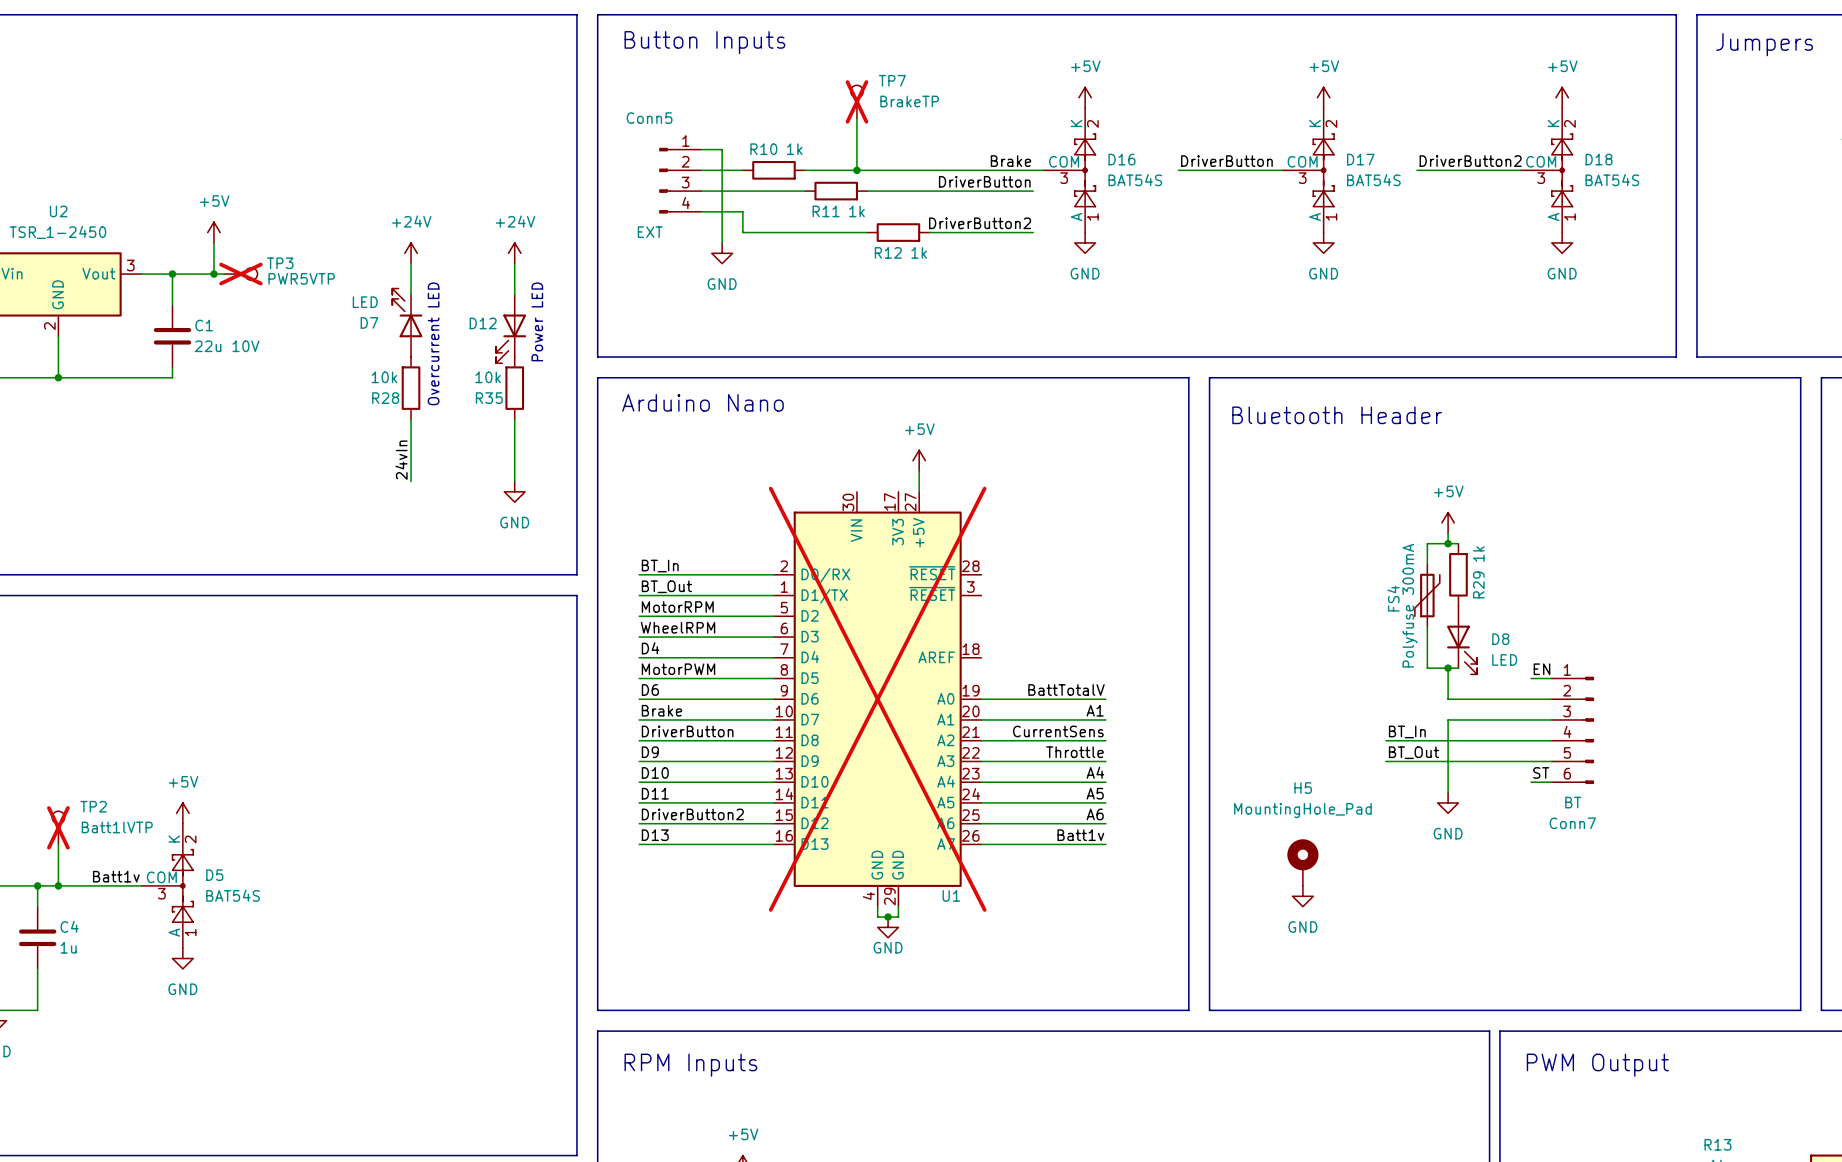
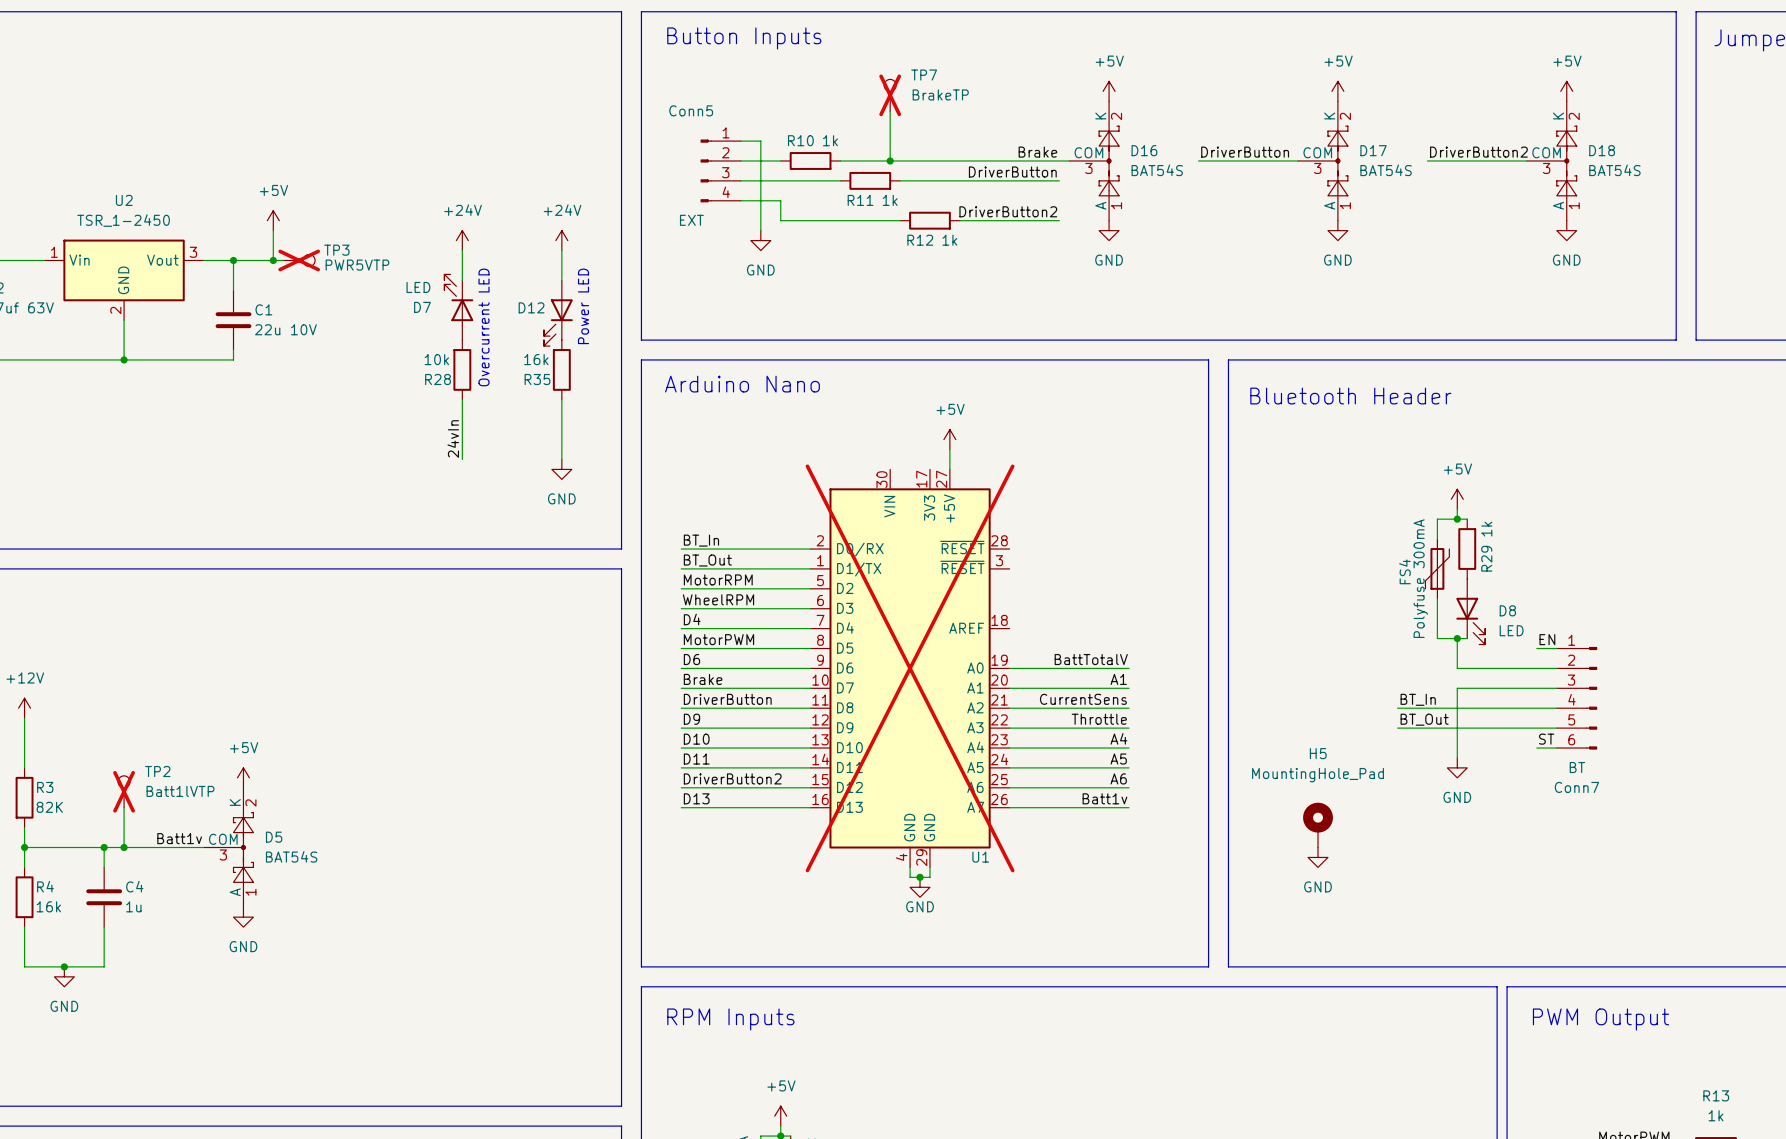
R35 value: 10k (488, 377) -> 16k (536, 359)

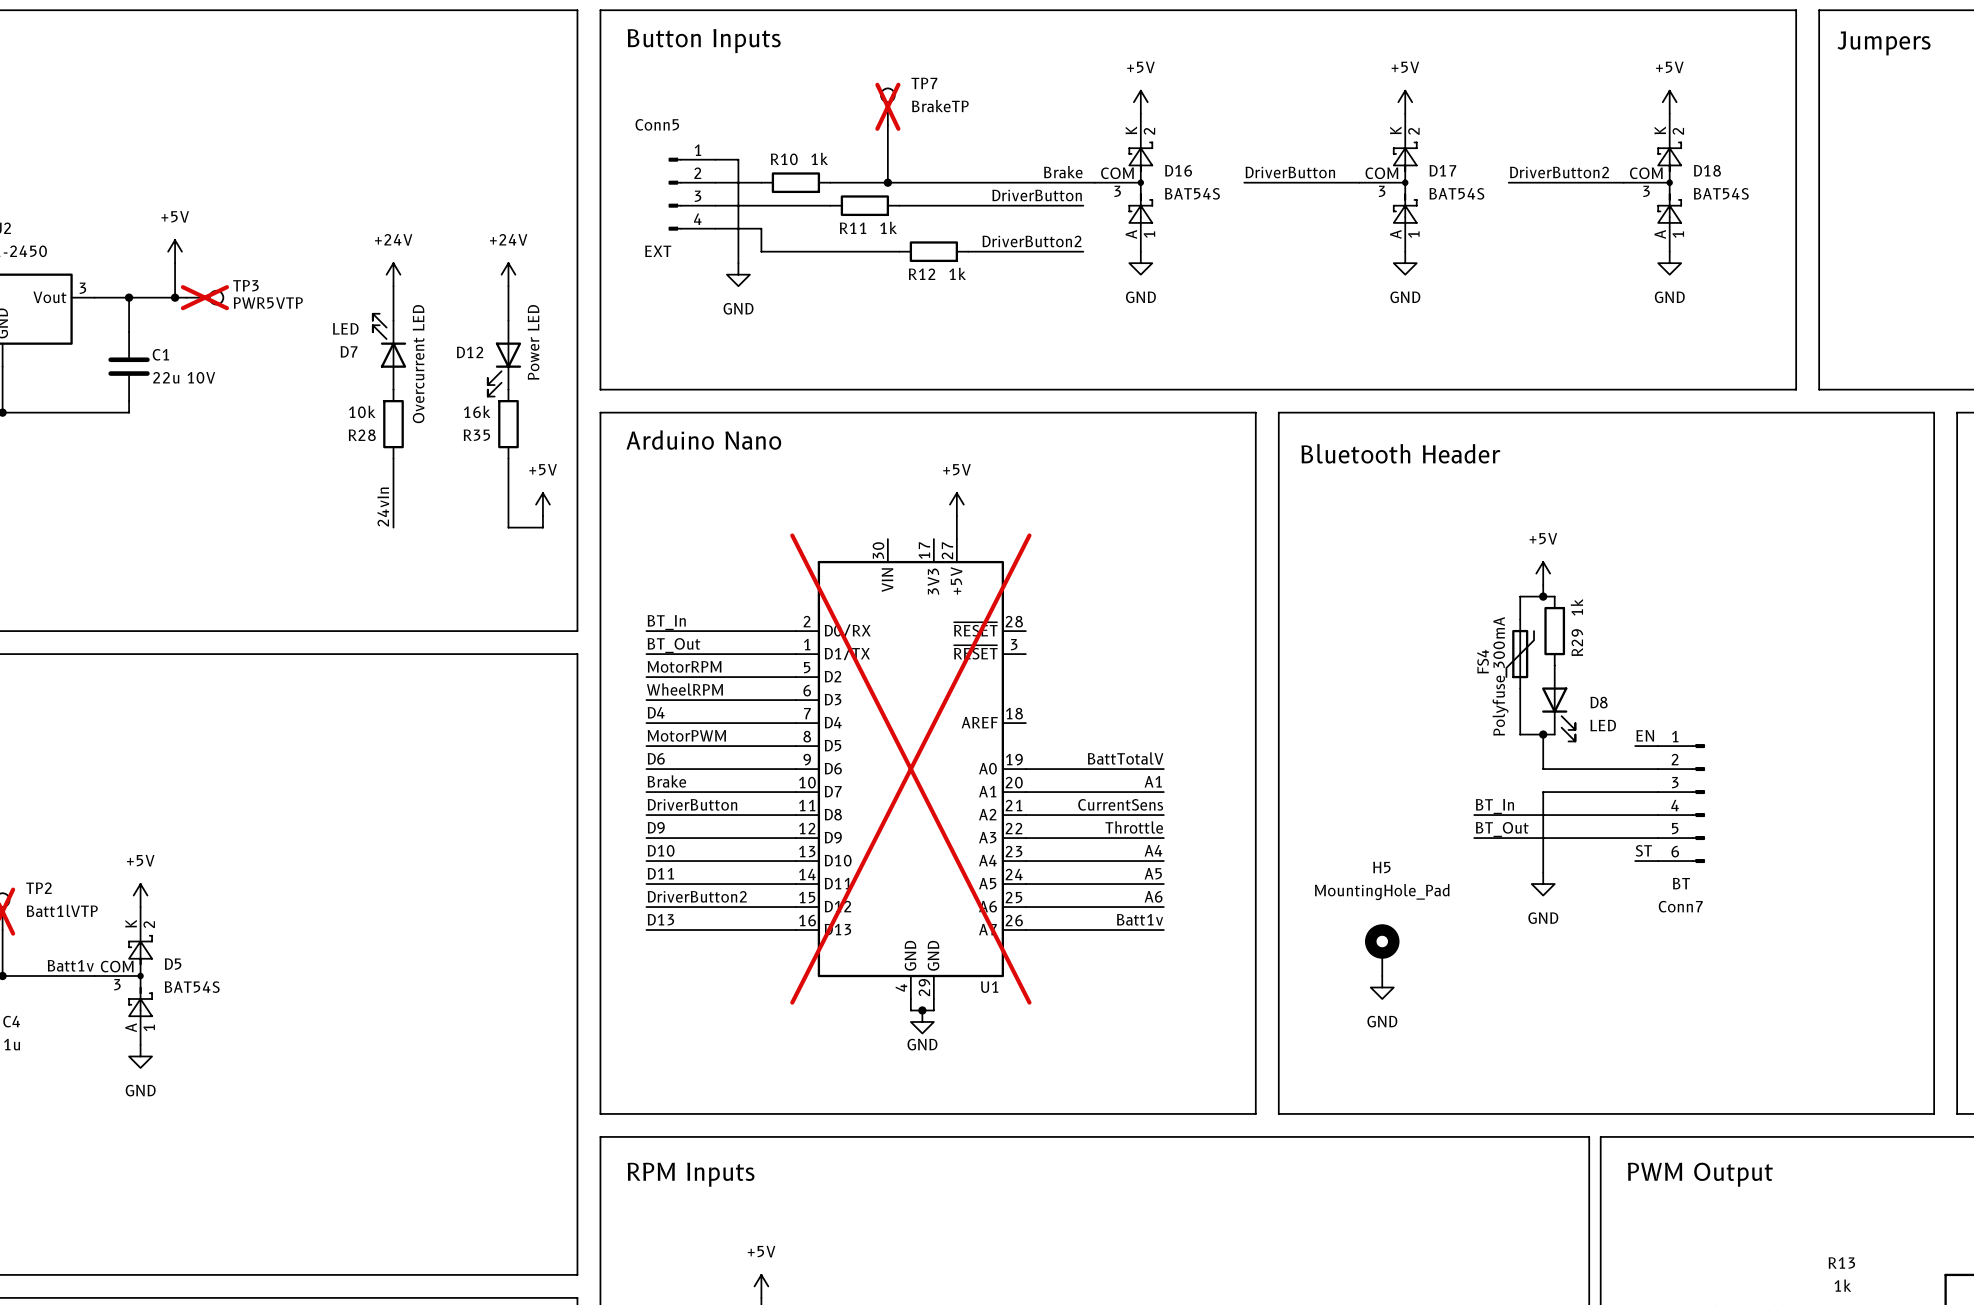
power symbol: none -> +5V (542, 504)
wire: none -> (542, 516) (542, 527) (508, 527)
power symbol: GND (561, 469) -> none

